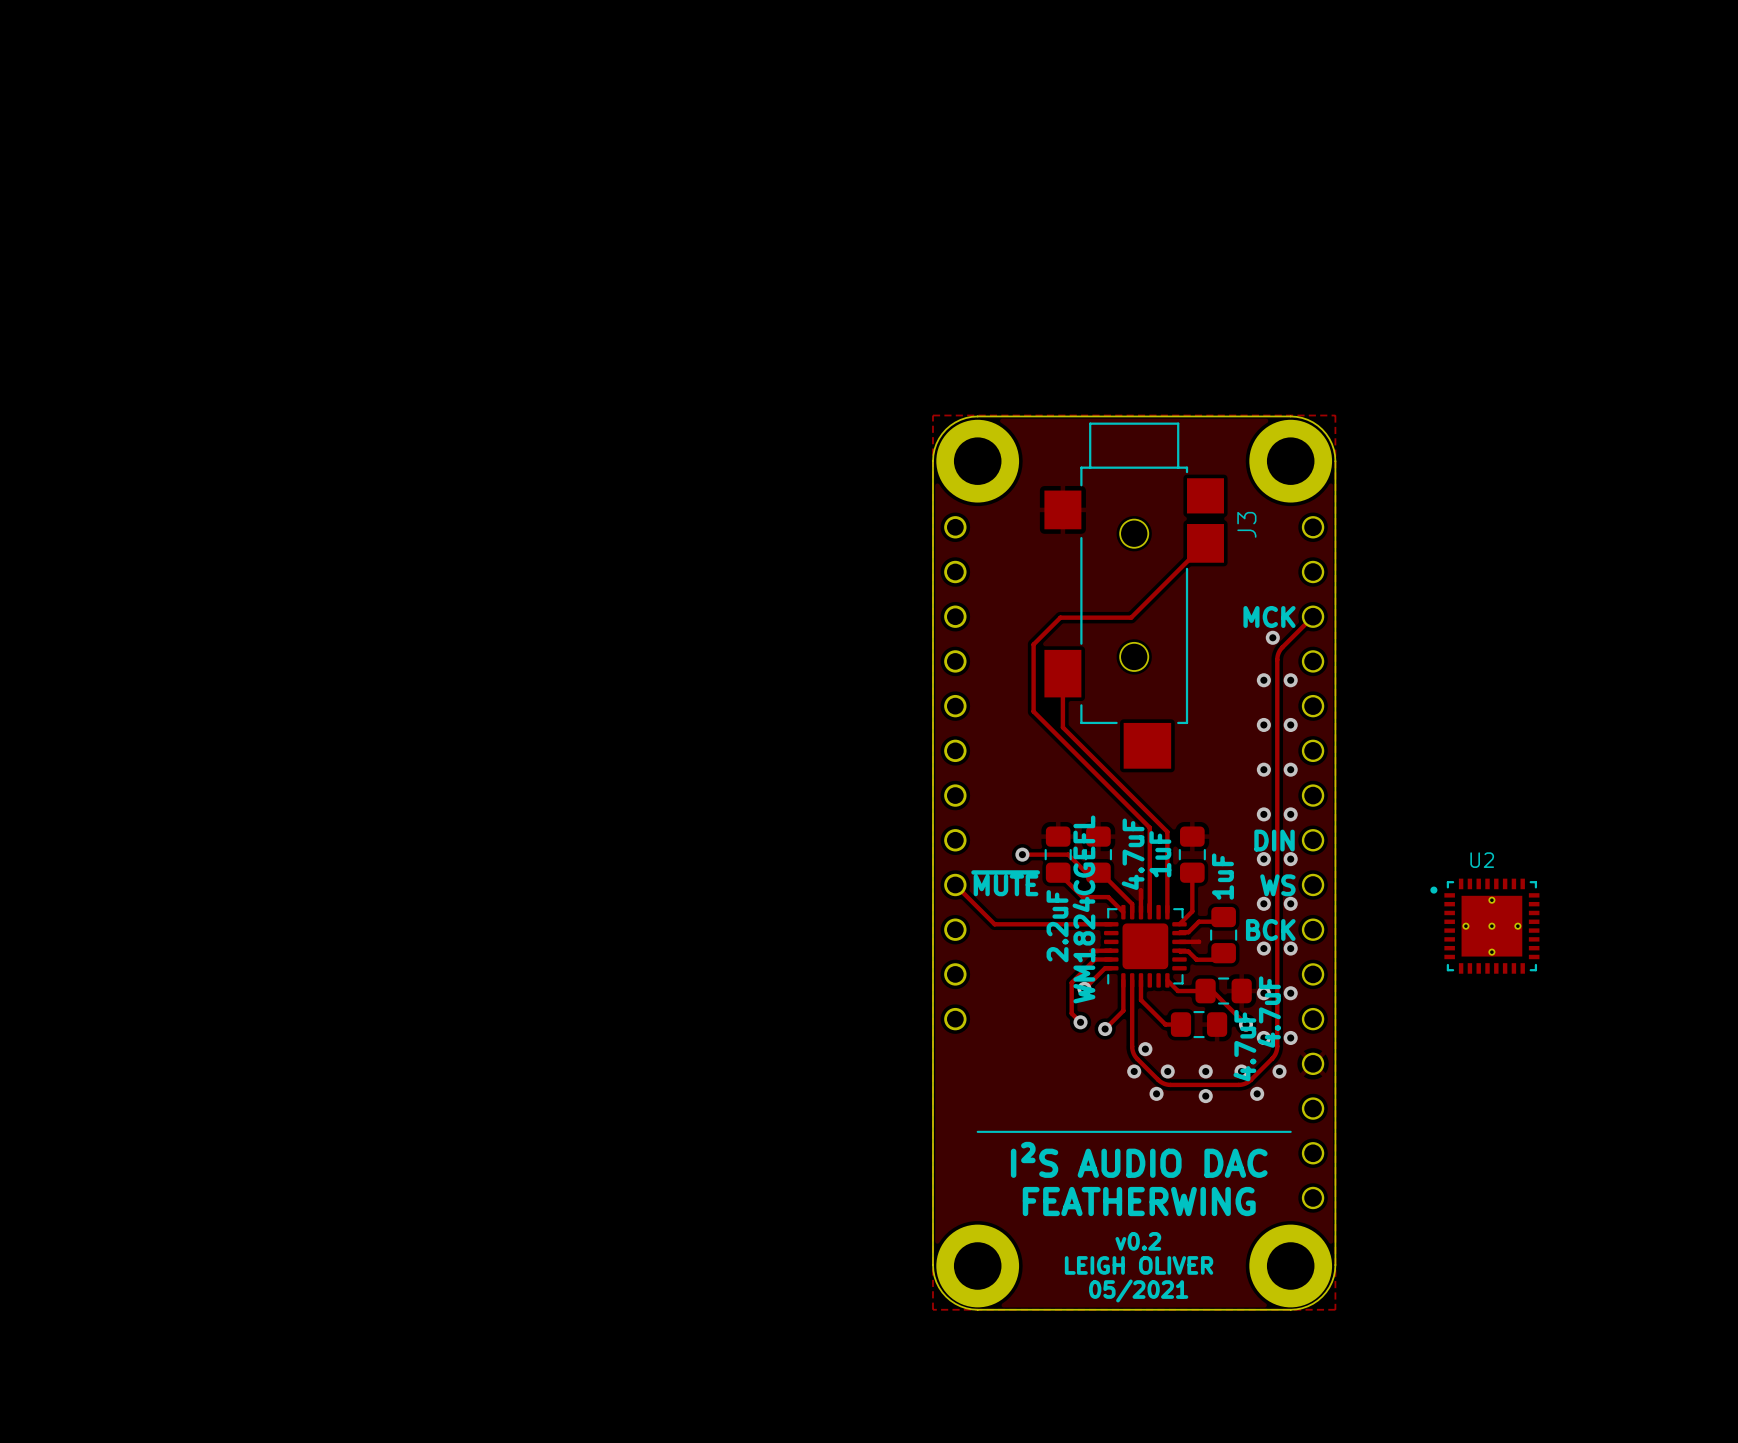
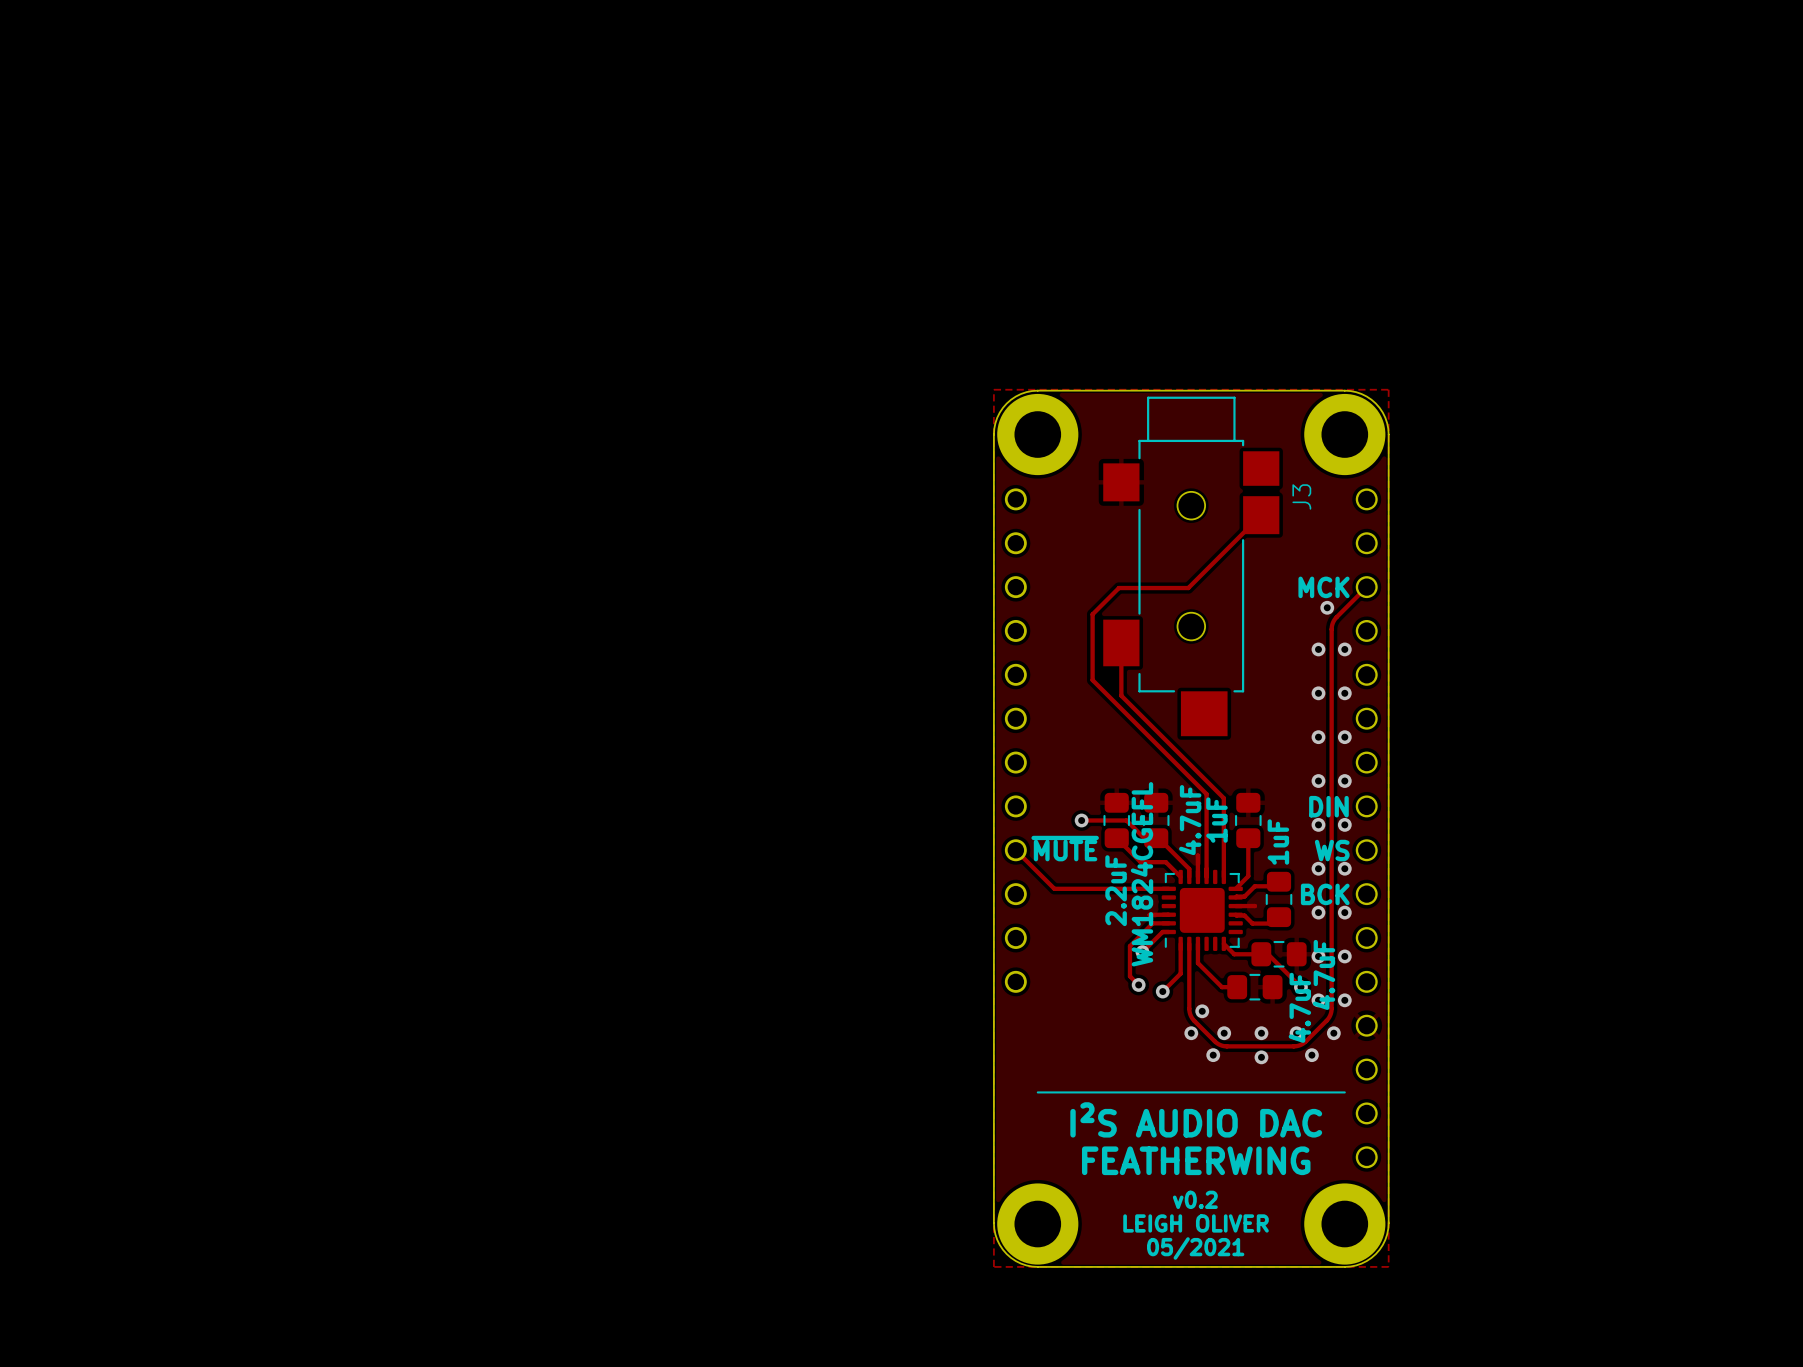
U2: (1484, 926) -> none

